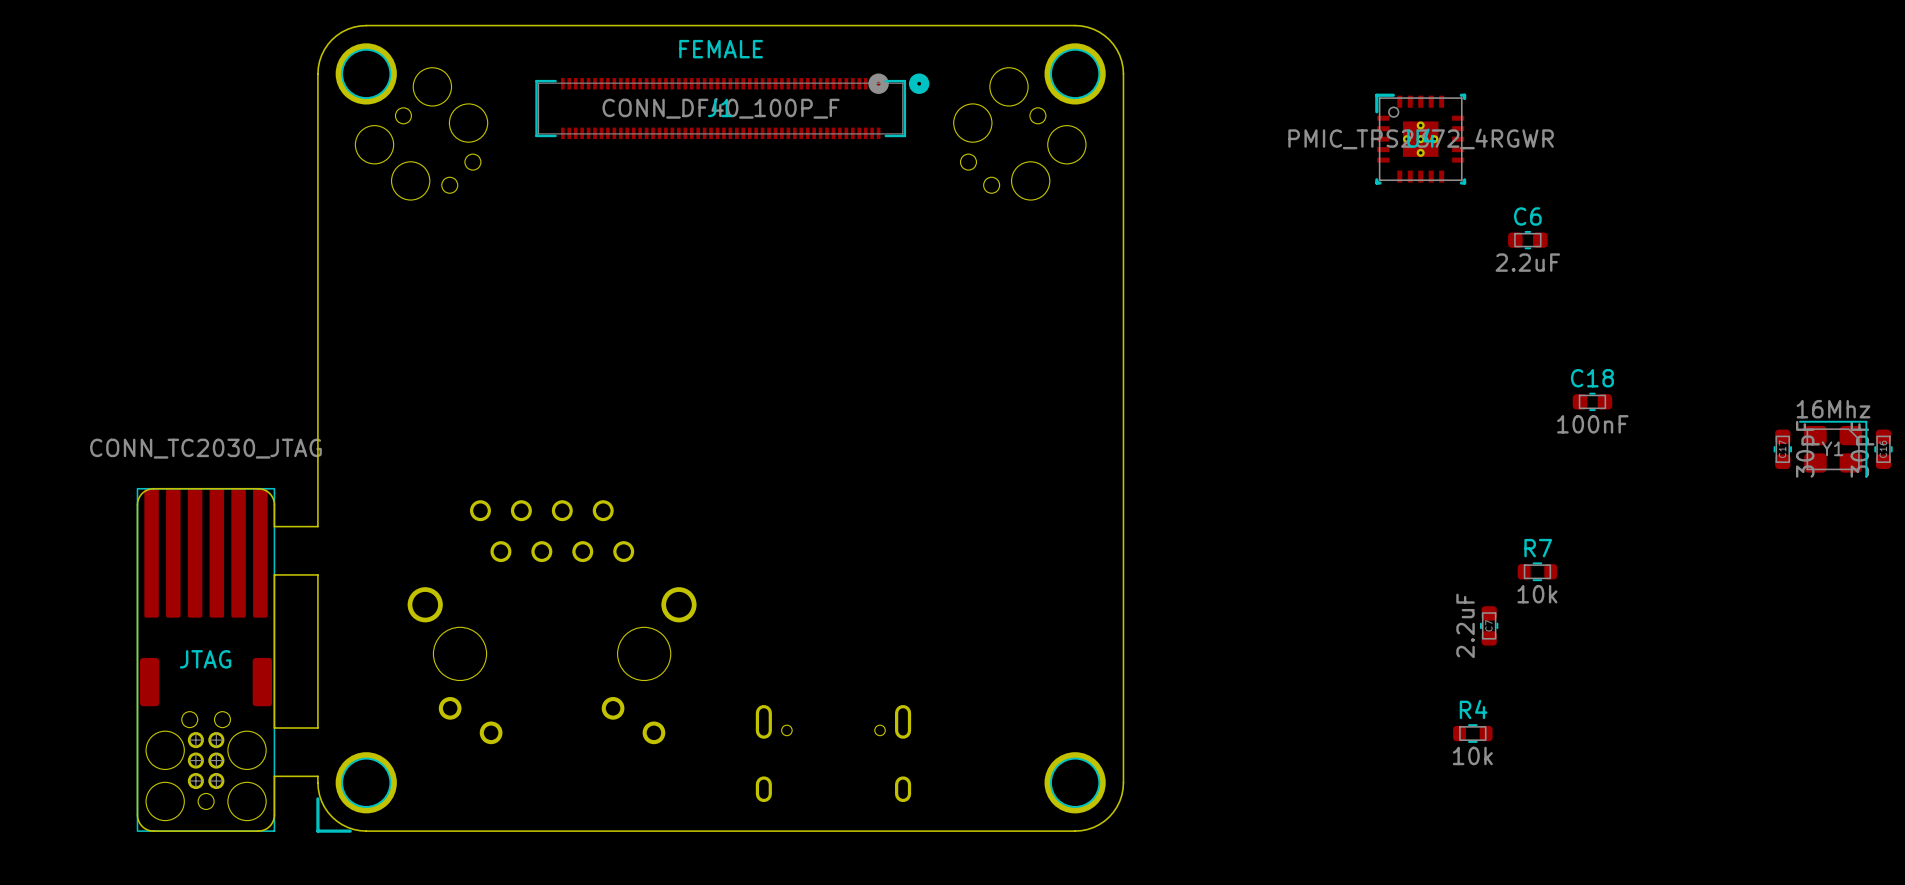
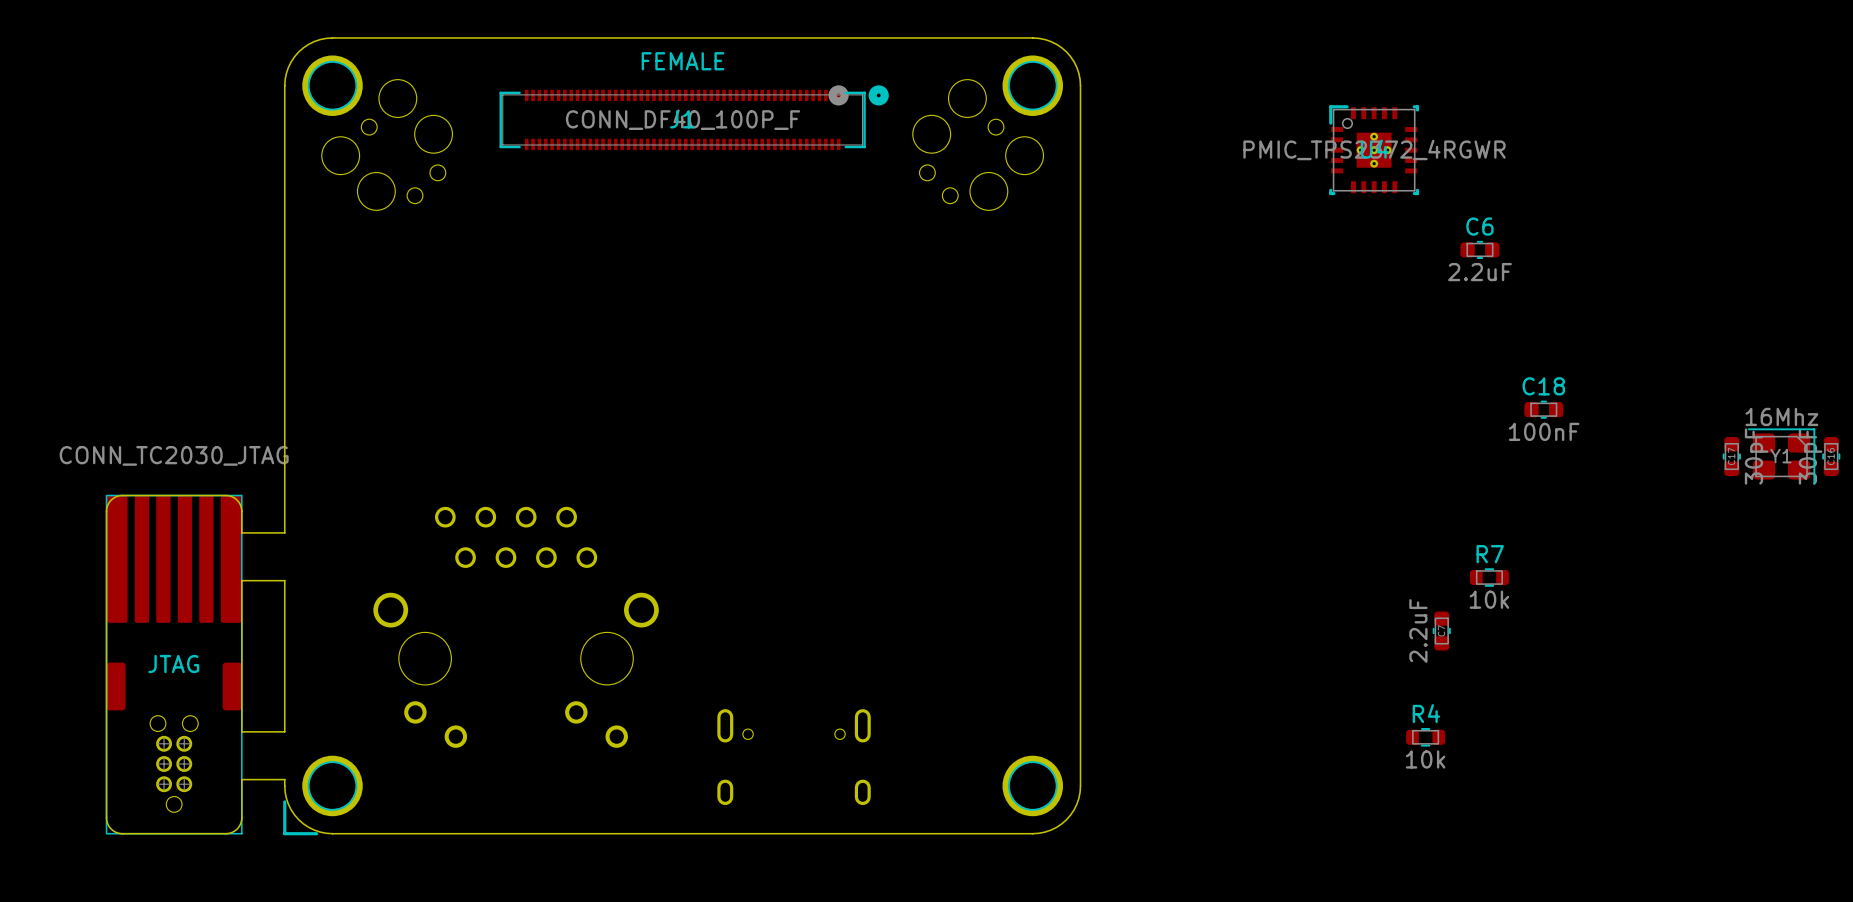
JTAG footprint: [136, 487, 276, 832] -> [105, 494, 243, 835]

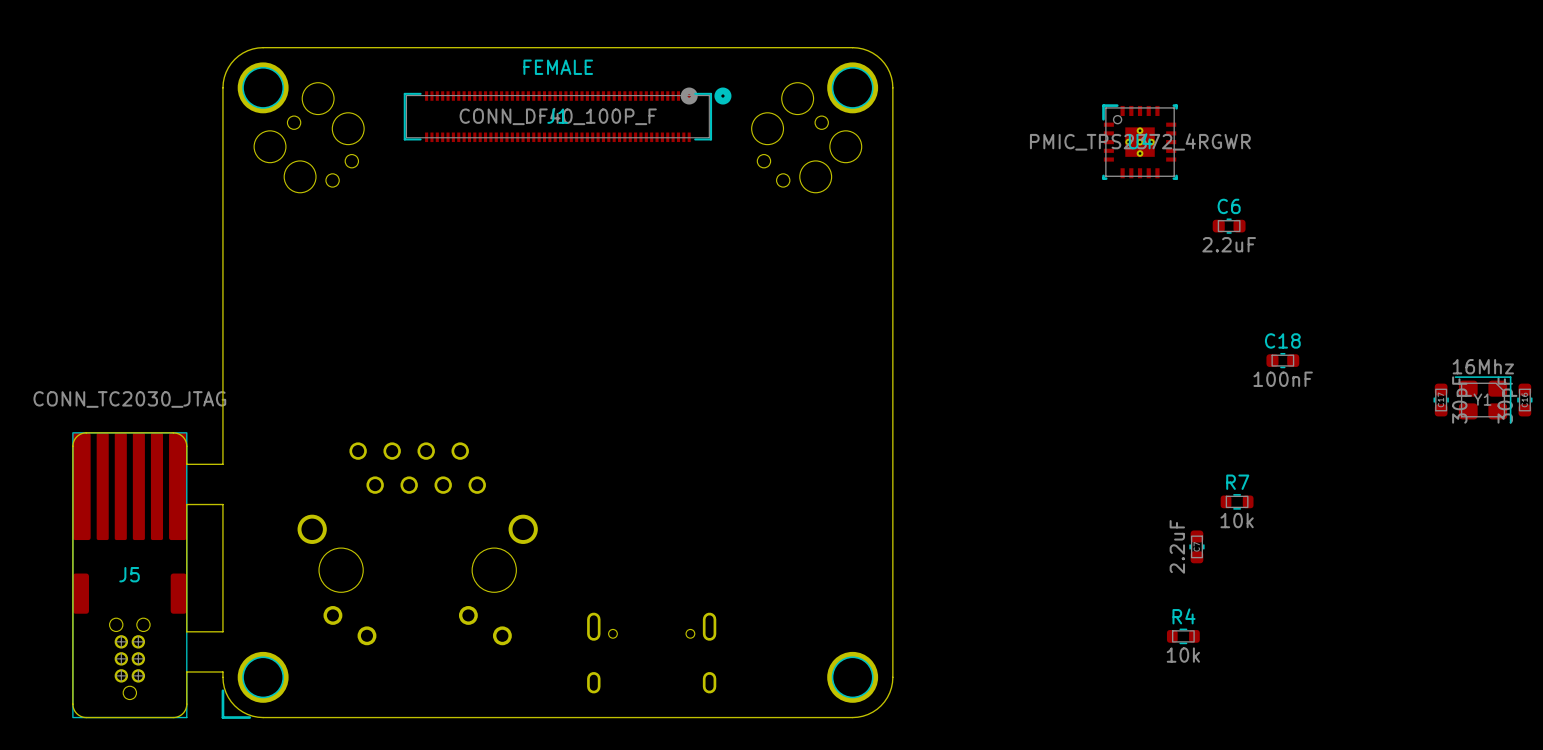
JTAG name: JTAG (173, 664) -> J5 (129, 574)

